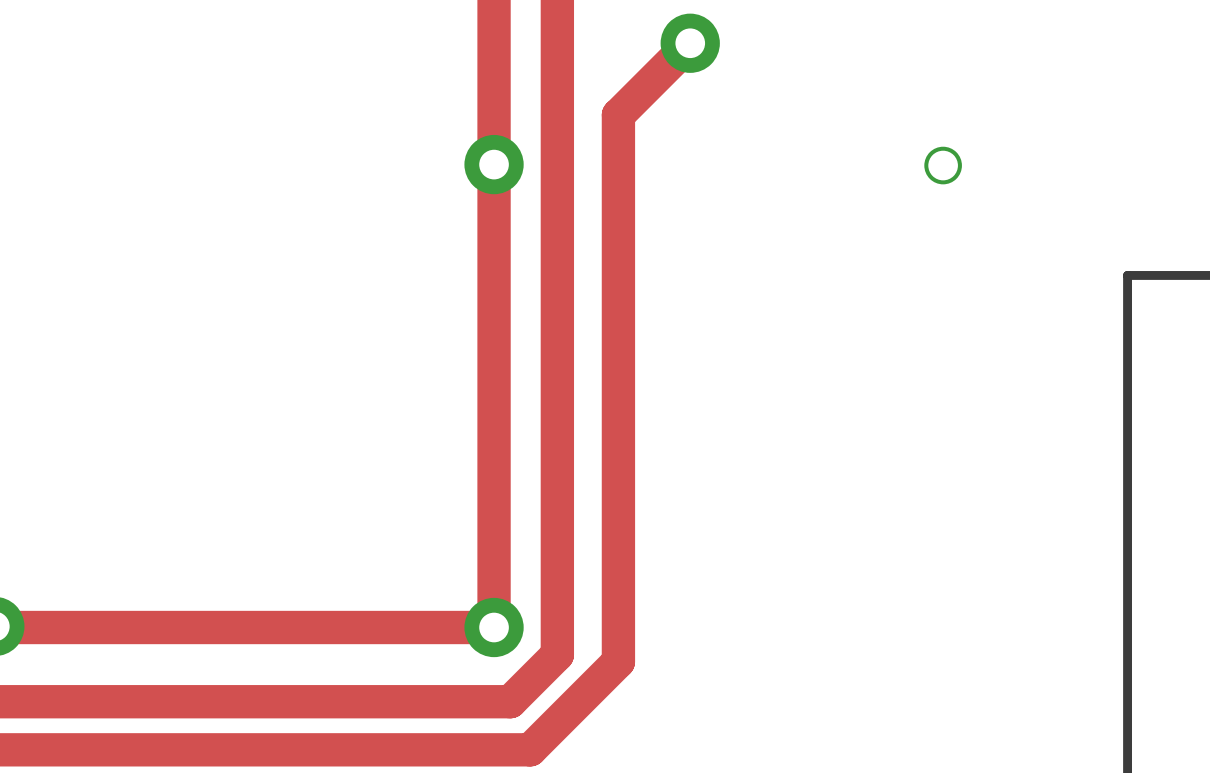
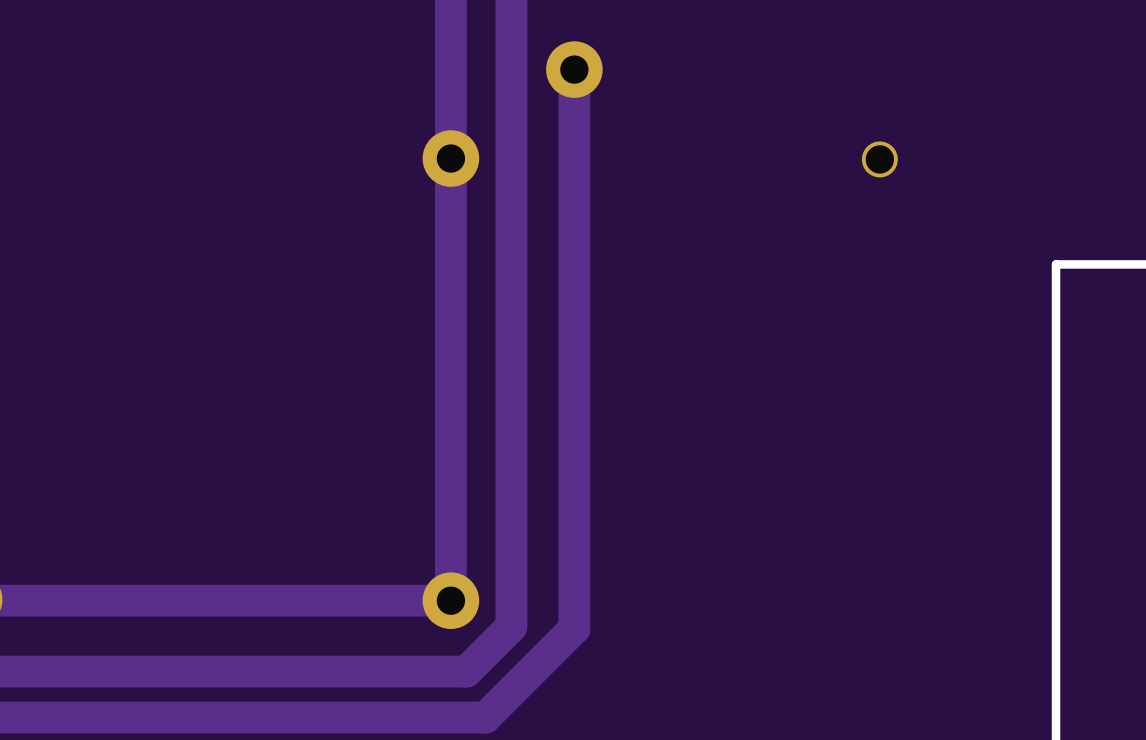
track: (690, 43) (618, 115) (618, 661) -> (574, 69) (574, 628) (569, 633)
via position: (690, 43) -> (574, 69)

